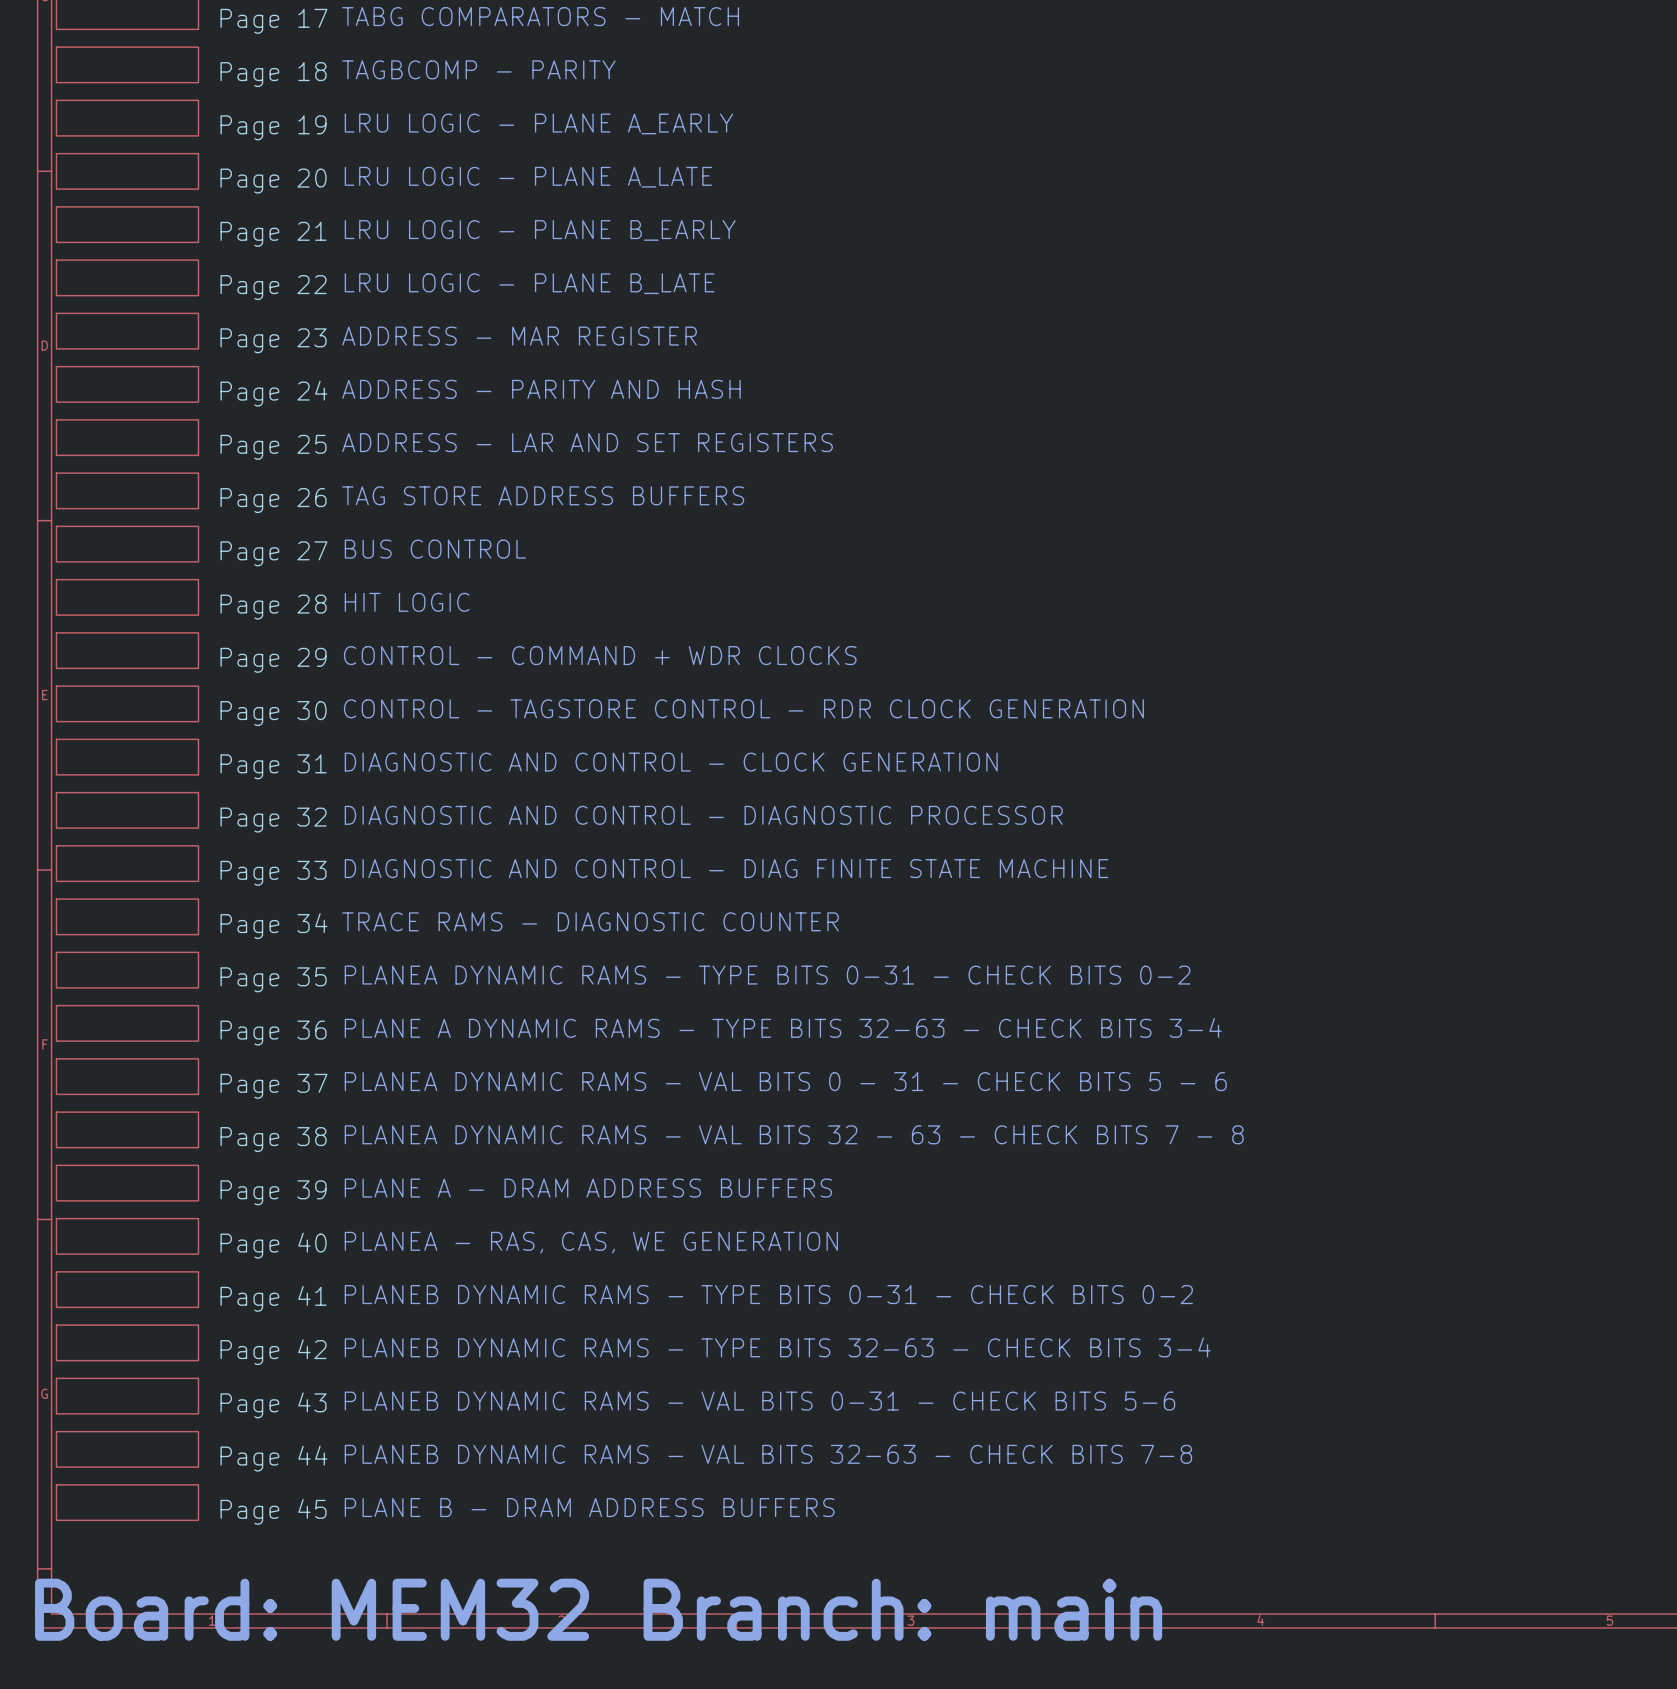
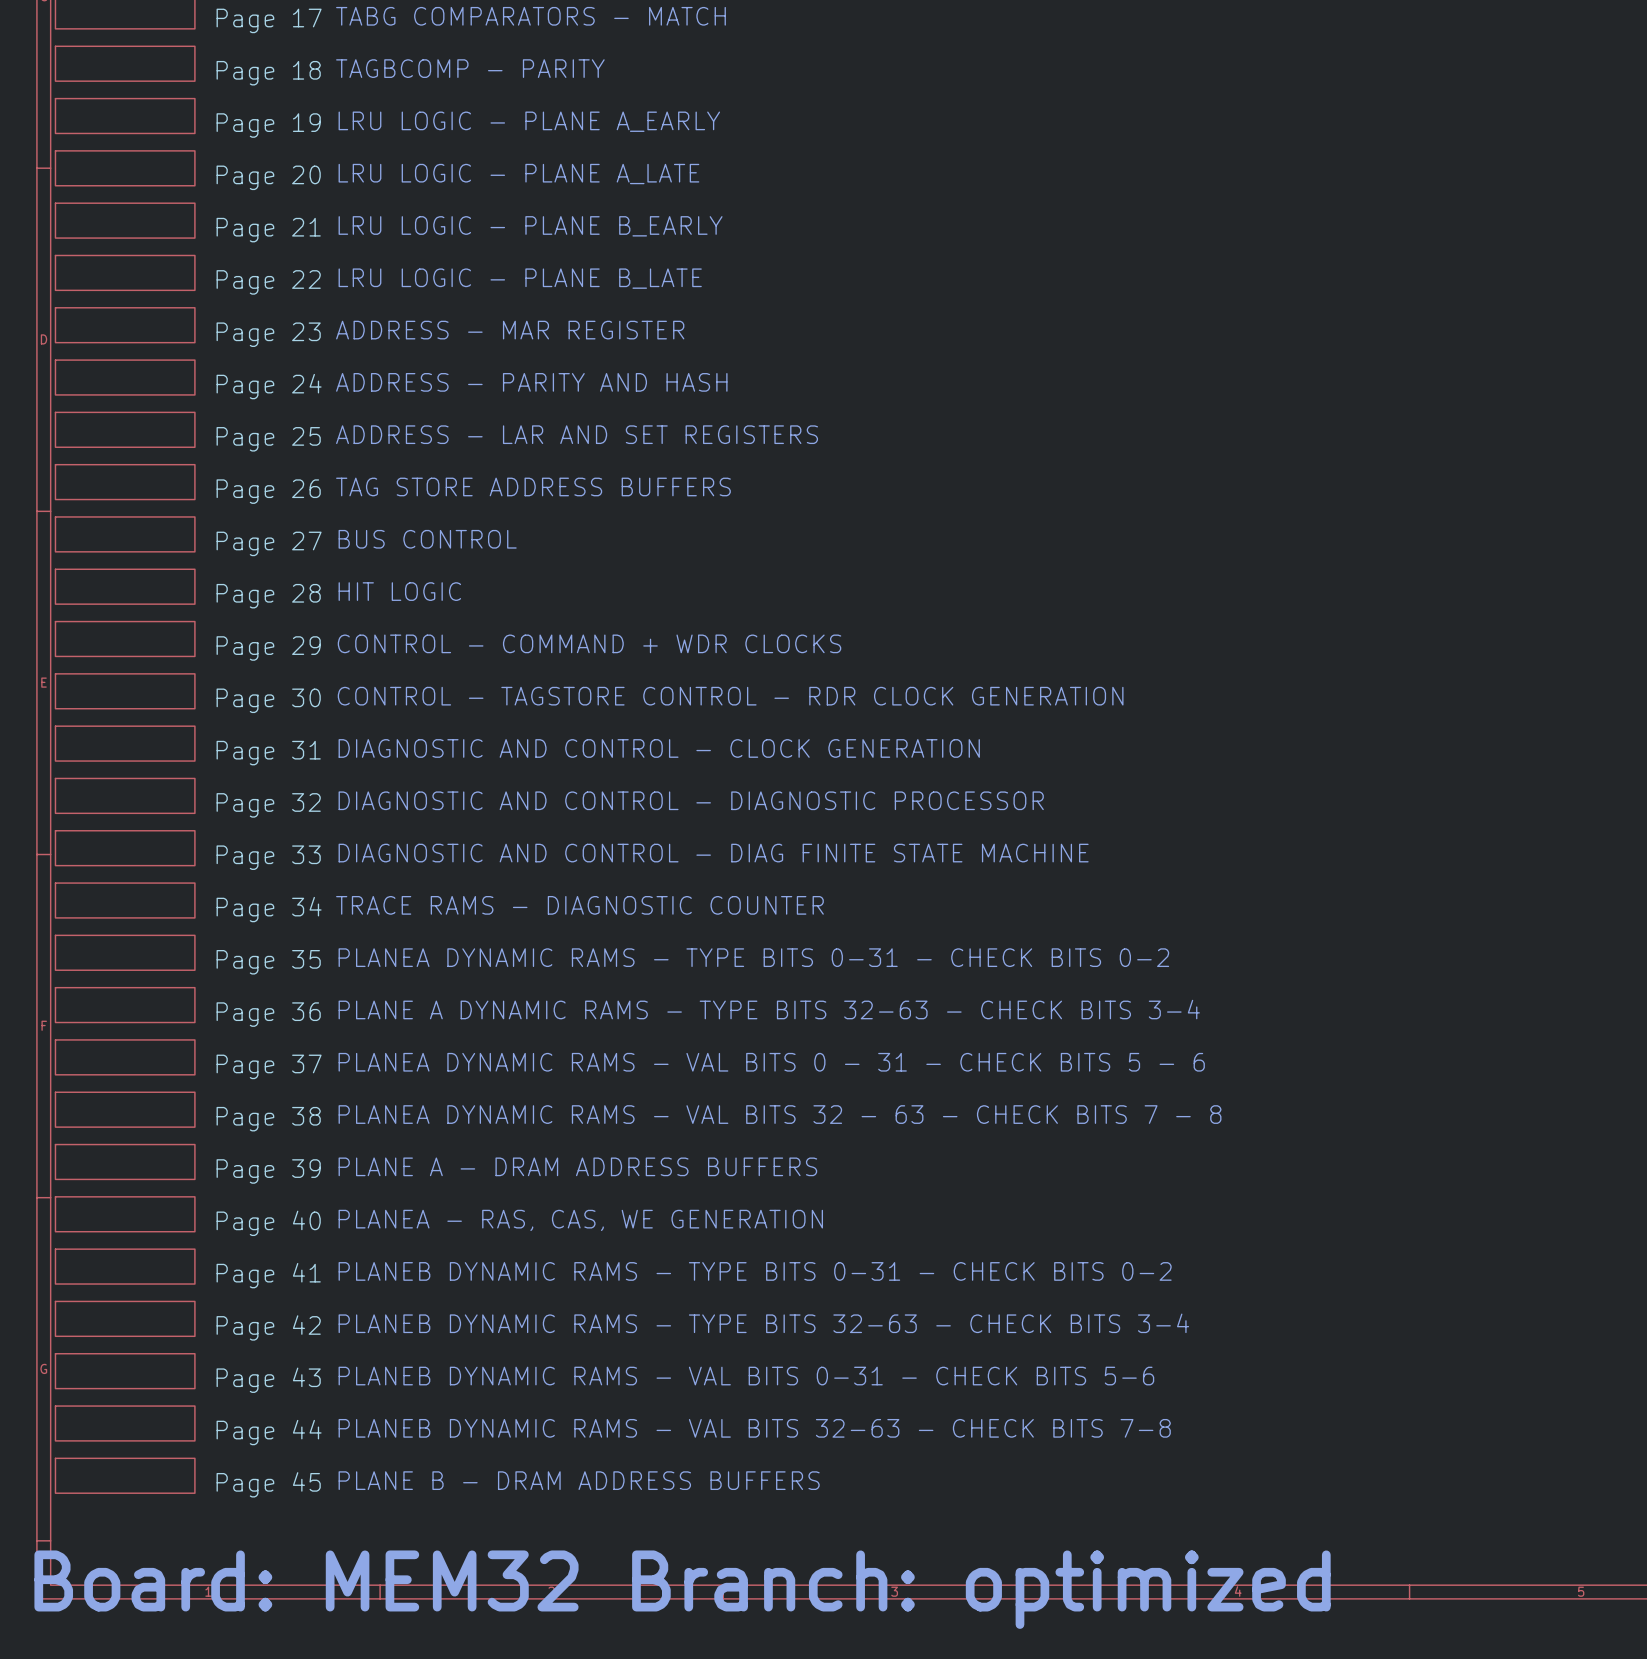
text: Board: MEM32 Branch: main (598, 1609) -> Board: MEM32 Branch: optimized (682, 1589)

